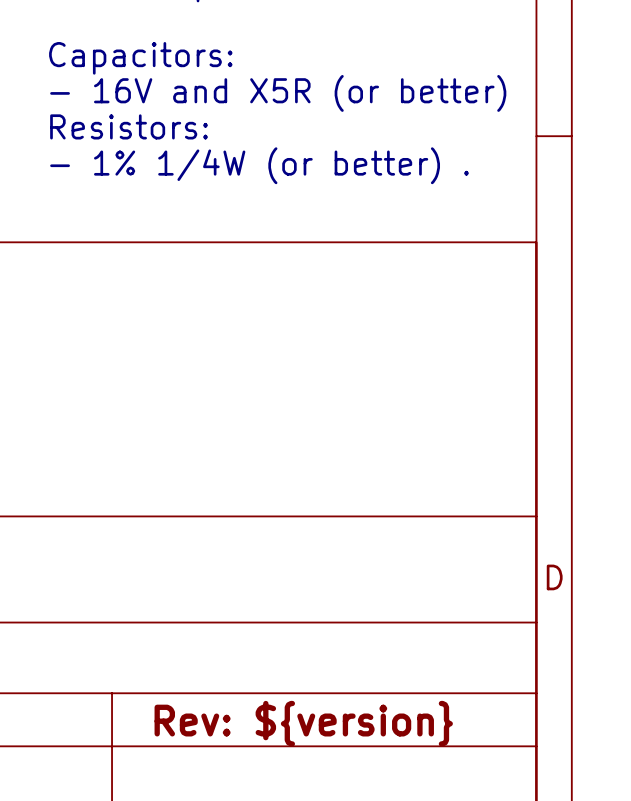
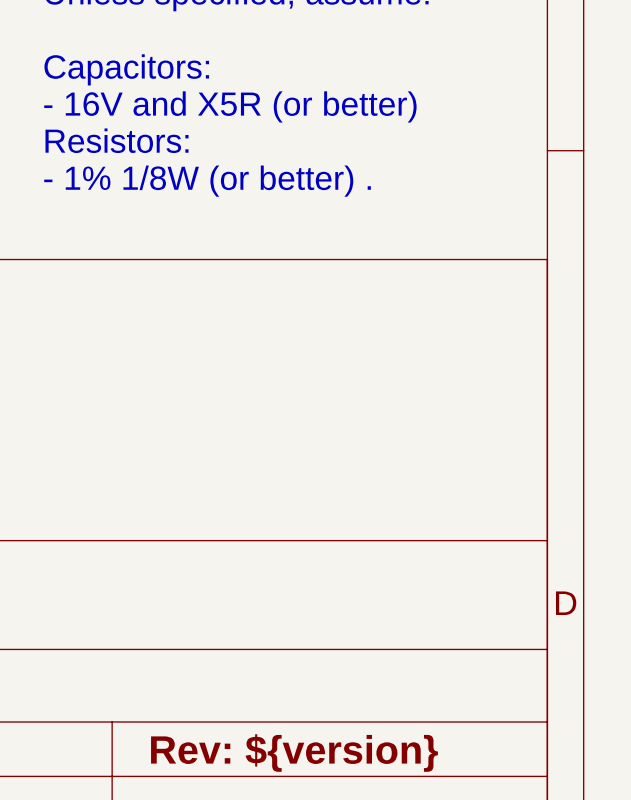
text: - 1% 1/4W (or better) . (259, 165) -> - 1% 1/8W (or better) . (207, 181)

